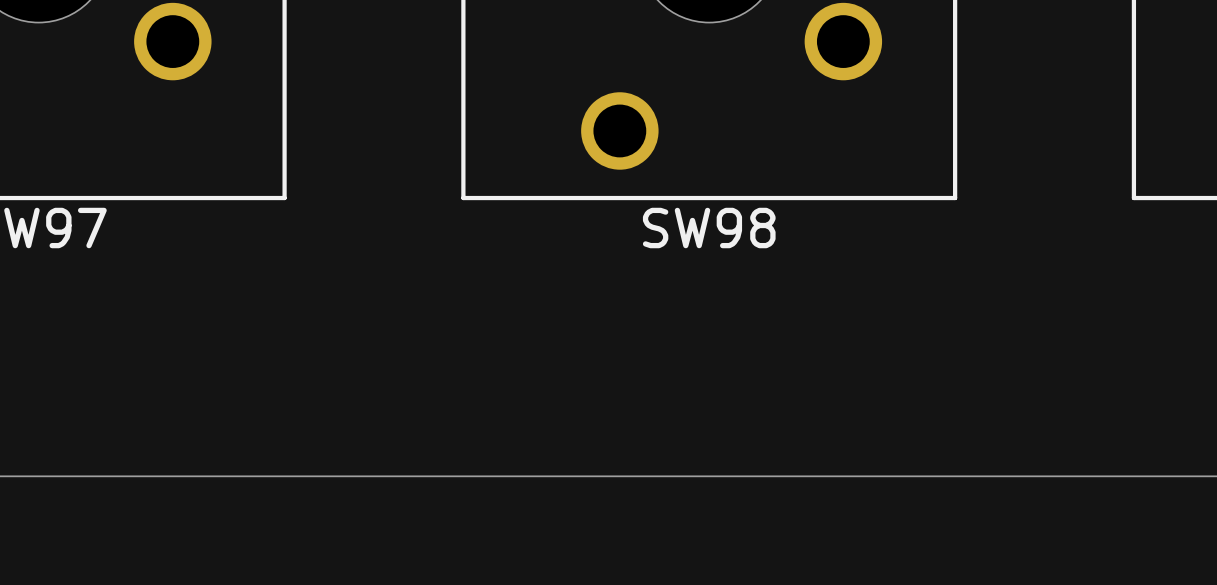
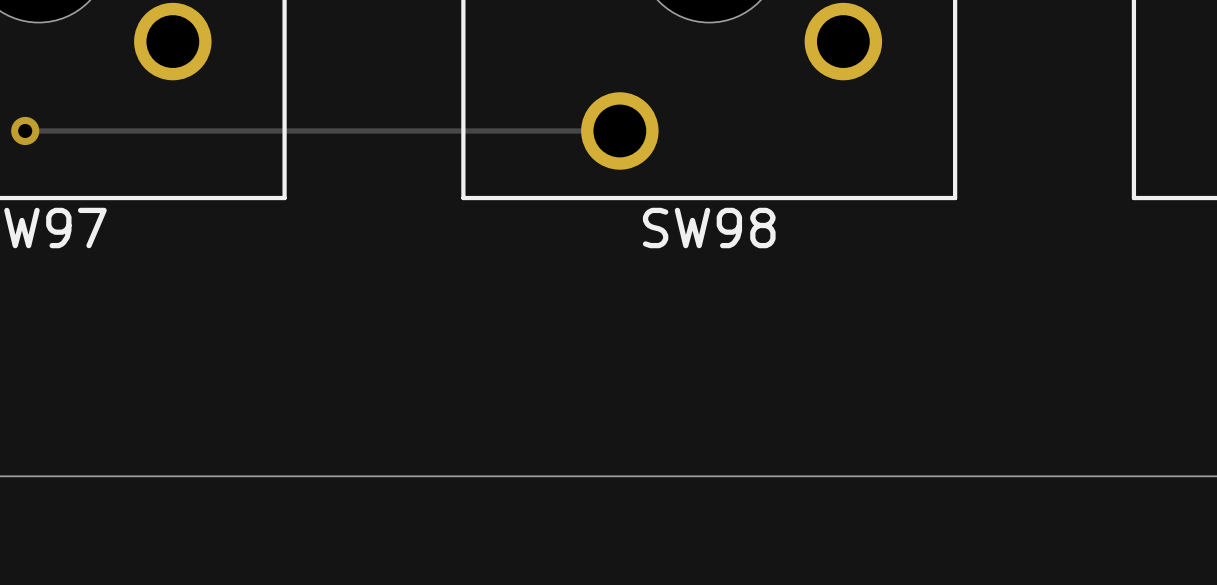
track: none -> (25, 130) (619, 130)
via: none -> (25, 130)

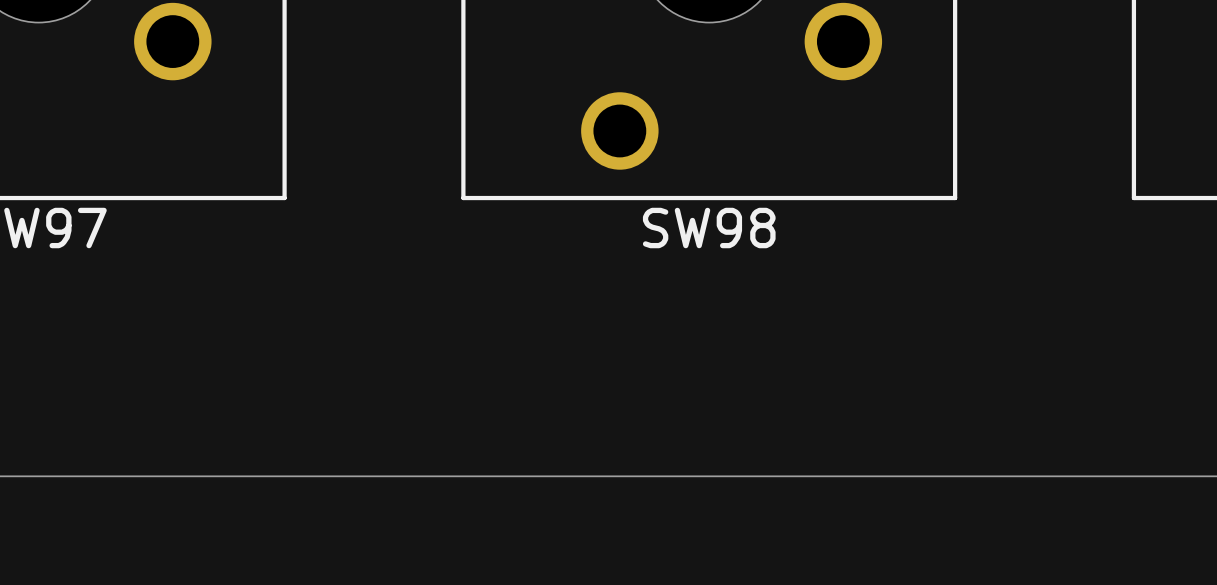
track: (25, 130) (619, 130) -> none
via: (25, 130) -> none

